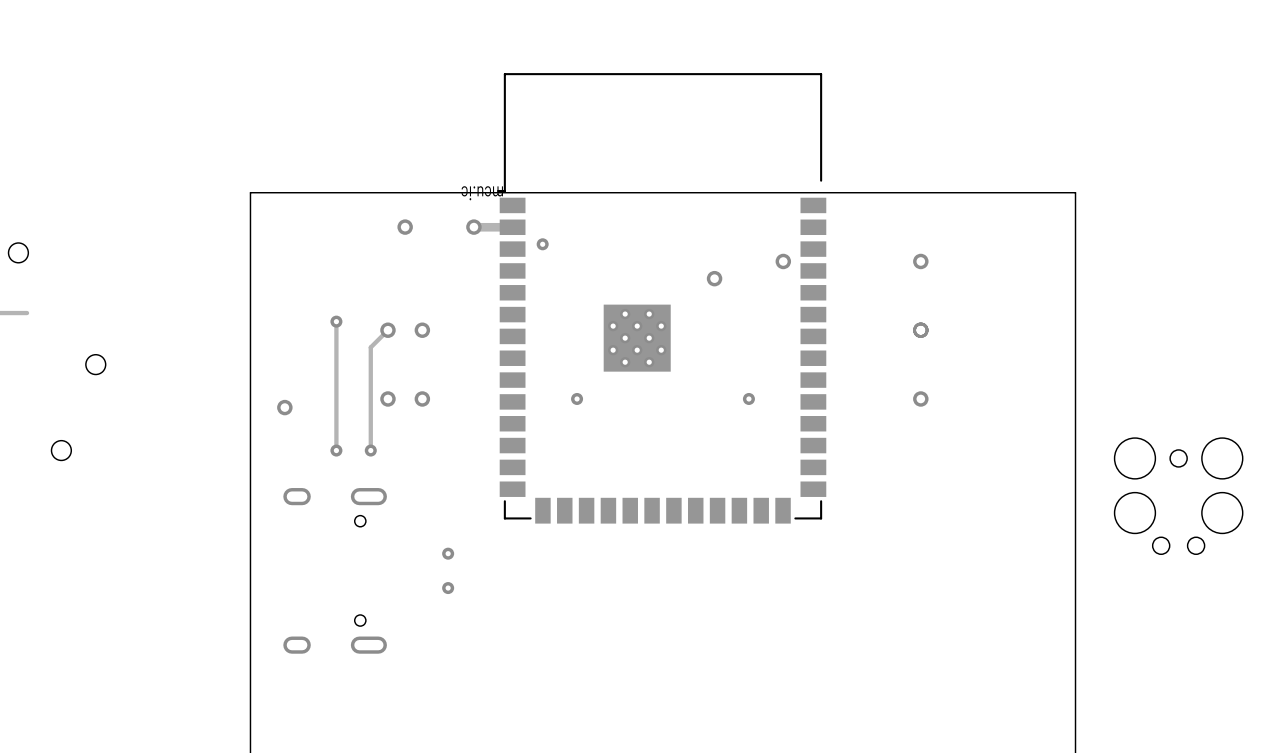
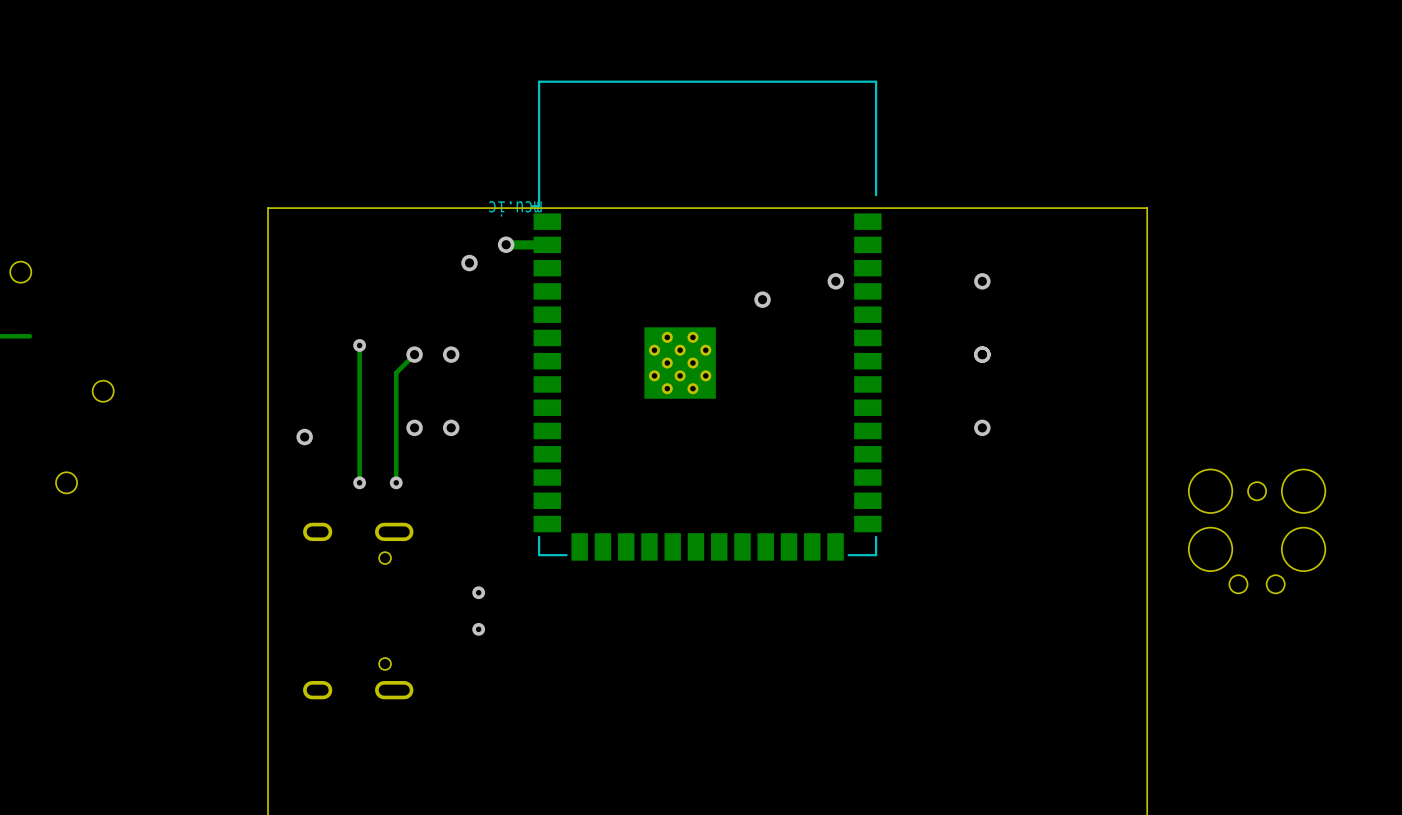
via position: (405, 227) -> (469, 263)
via: (542, 244) -> none
via: (577, 398) -> none
via: (748, 398) -> none

